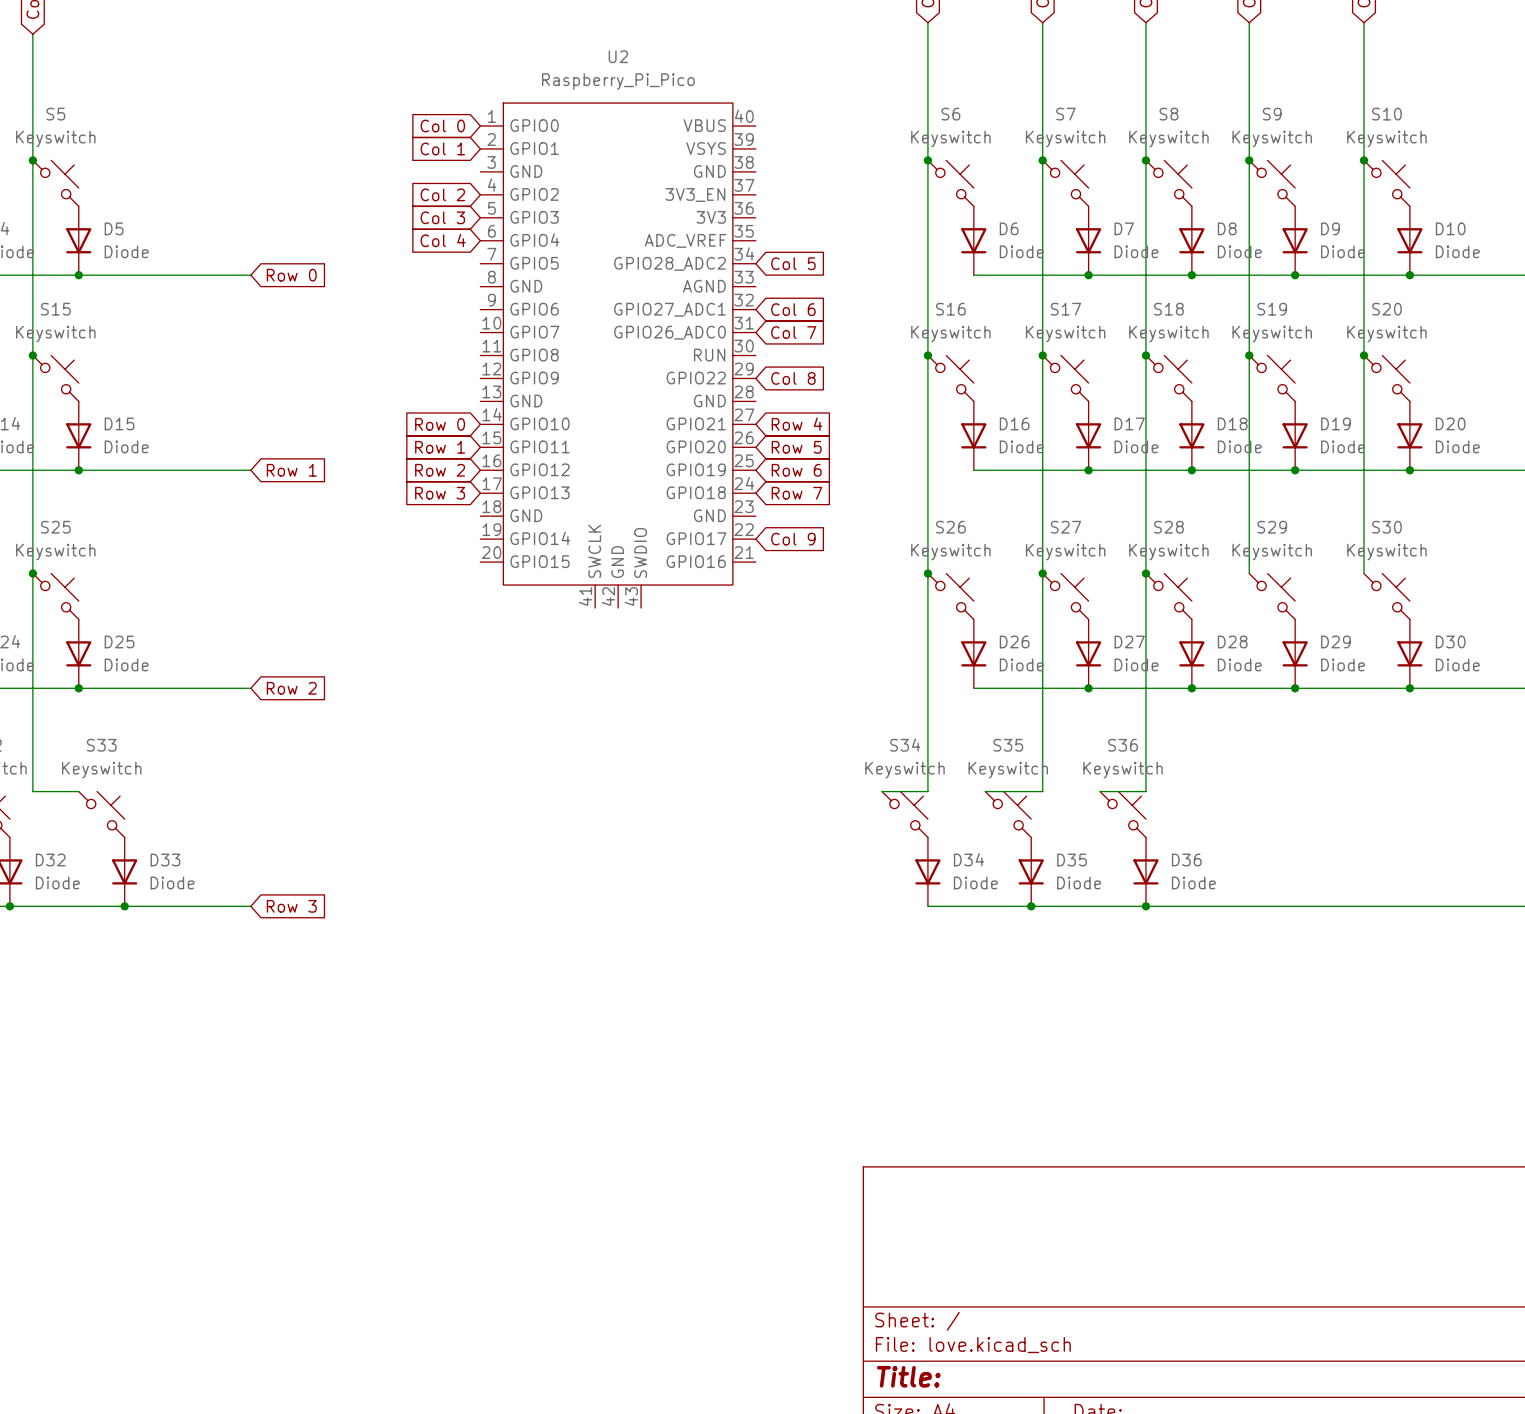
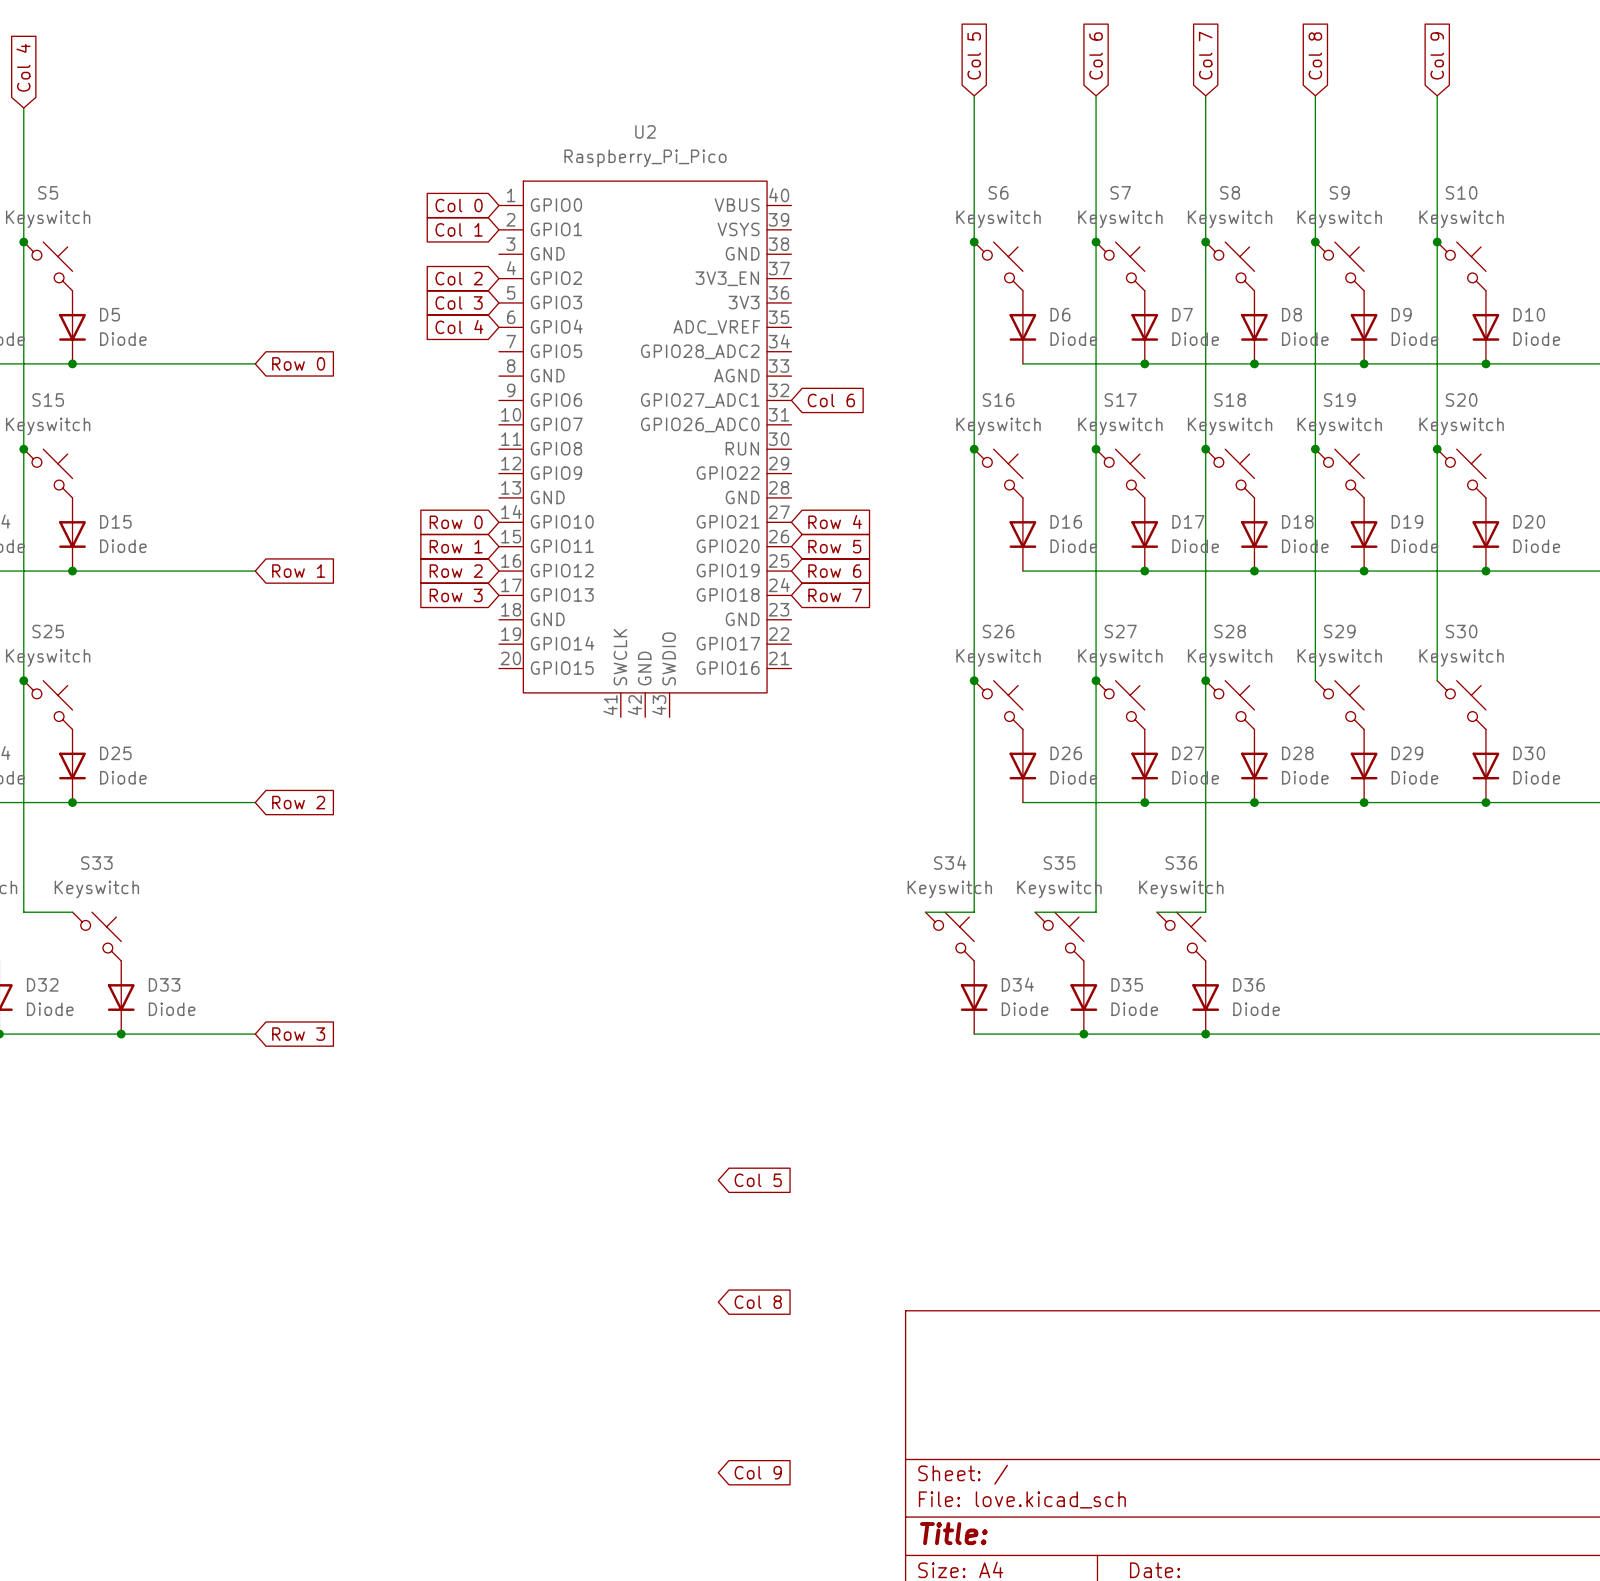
global label: Col 5 (793, 263) -> none
global label: Col 7 (793, 332) -> none
global label: Col 8 (793, 378) -> none
global label: Col 9 (793, 539) -> none
global label: none -> Col 5 (758, 1180)
global label: none -> Col 8 (758, 1302)
global label: none -> Col 9 (758, 1472)

